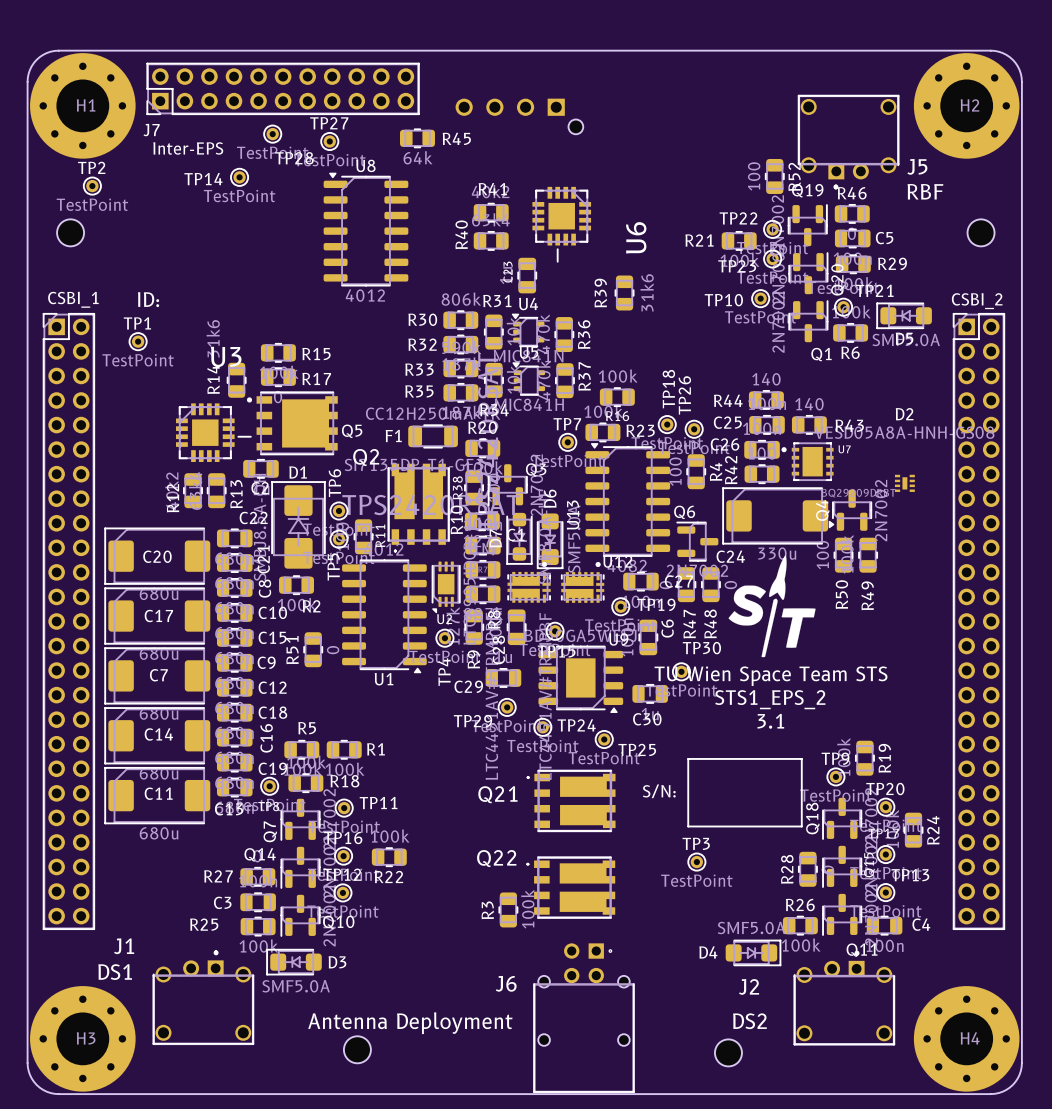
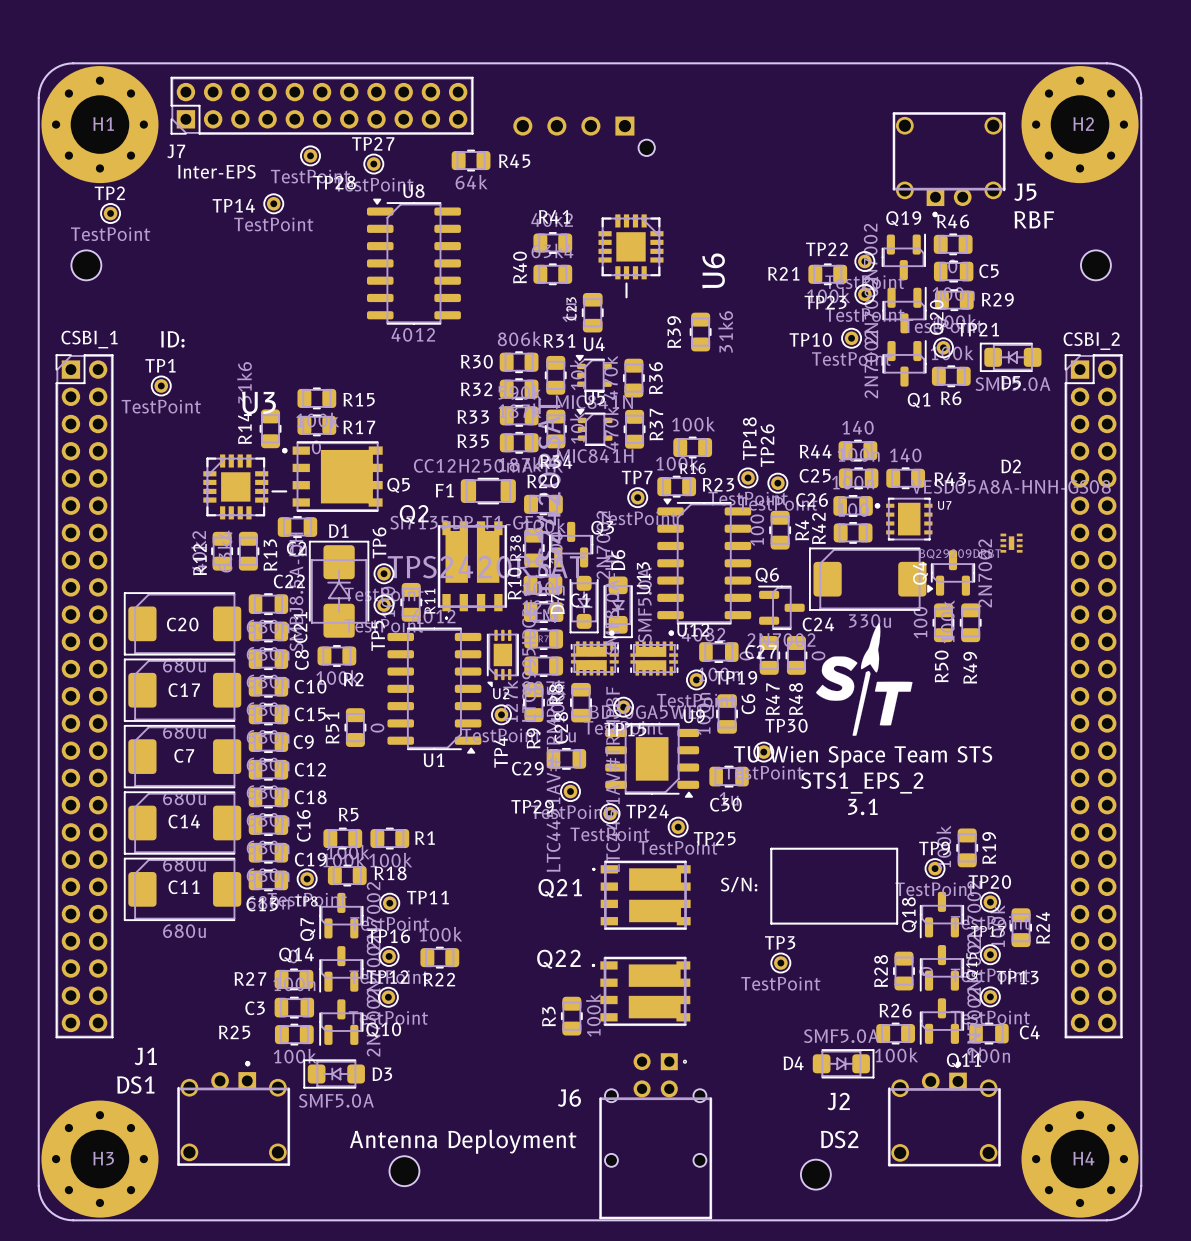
R52: 100 (774, 176) -> none

